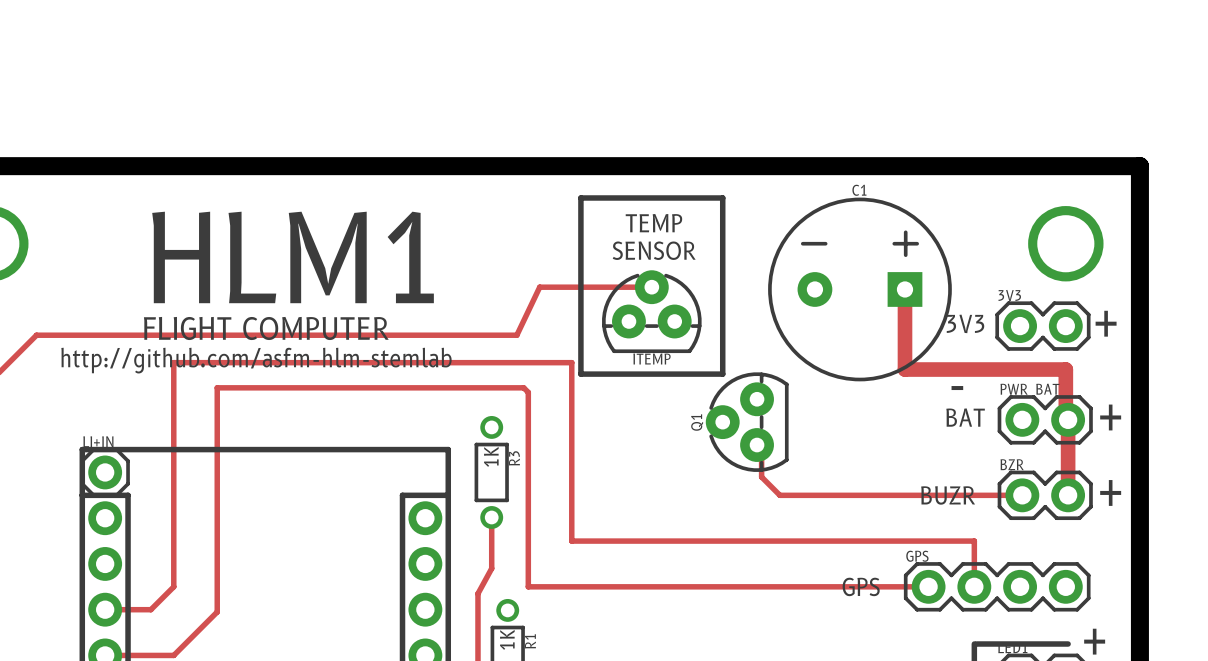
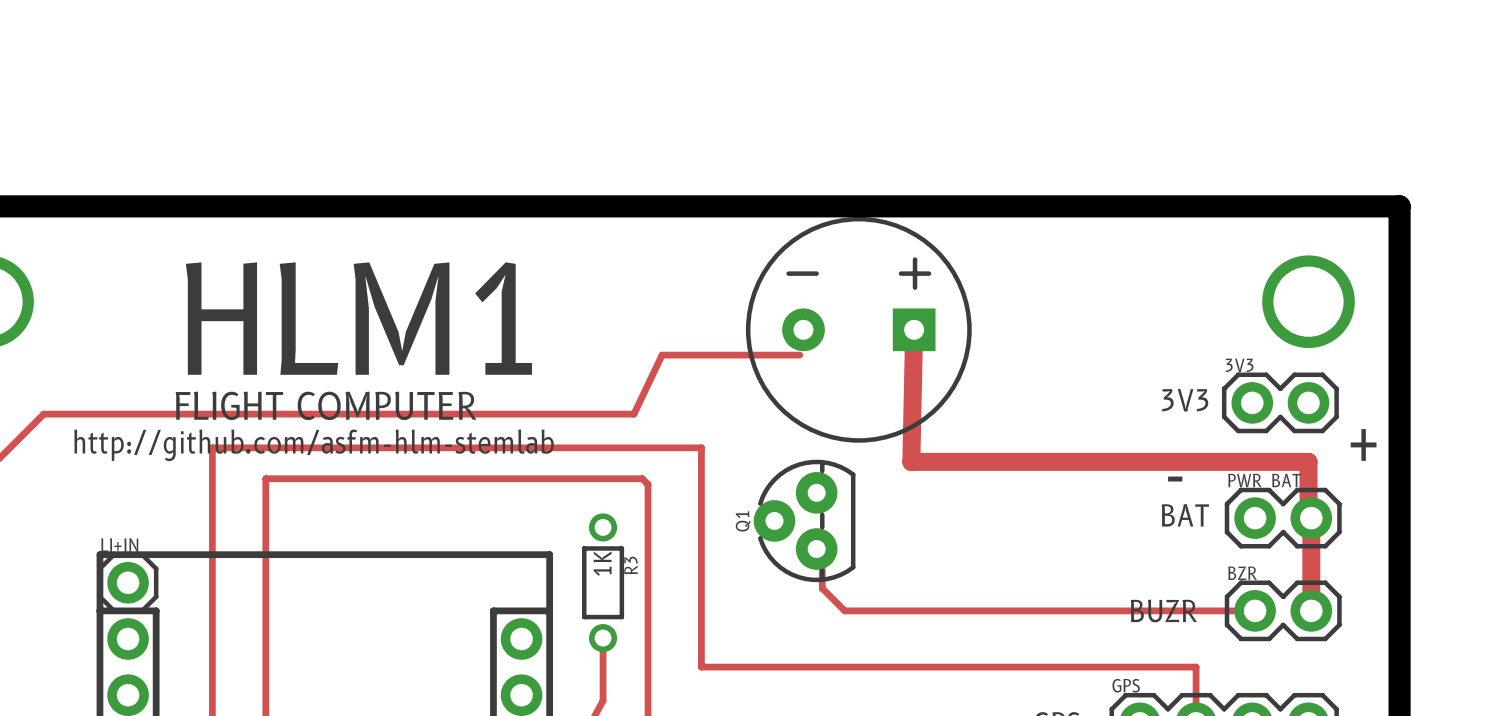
line: (580, 197) (580, 374) (722, 374) (722, 197) (580, 197) -> none
text: TEMP (653, 223) -> none
text: SENSOR (654, 250) -> none
C1 position: (859, 289) -> (858, 329)
track: (904, 289) (904, 369) (1065, 369) (1065, 374) -> (914, 329) (911, 461) (1308, 461)
ITEMP: (651, 311) -> none
text: + (1106, 323) -> none
text: none -> + (1363, 444)
text: + (1110, 417) -> none
Q1 position: (747, 422) -> (804, 520)
track: (757, 445) (761, 449) (761, 477) (779, 495) -> (816, 549) (822, 554) (822, 588) (844, 610) (957, 610)
text: + (1110, 492) -> none

